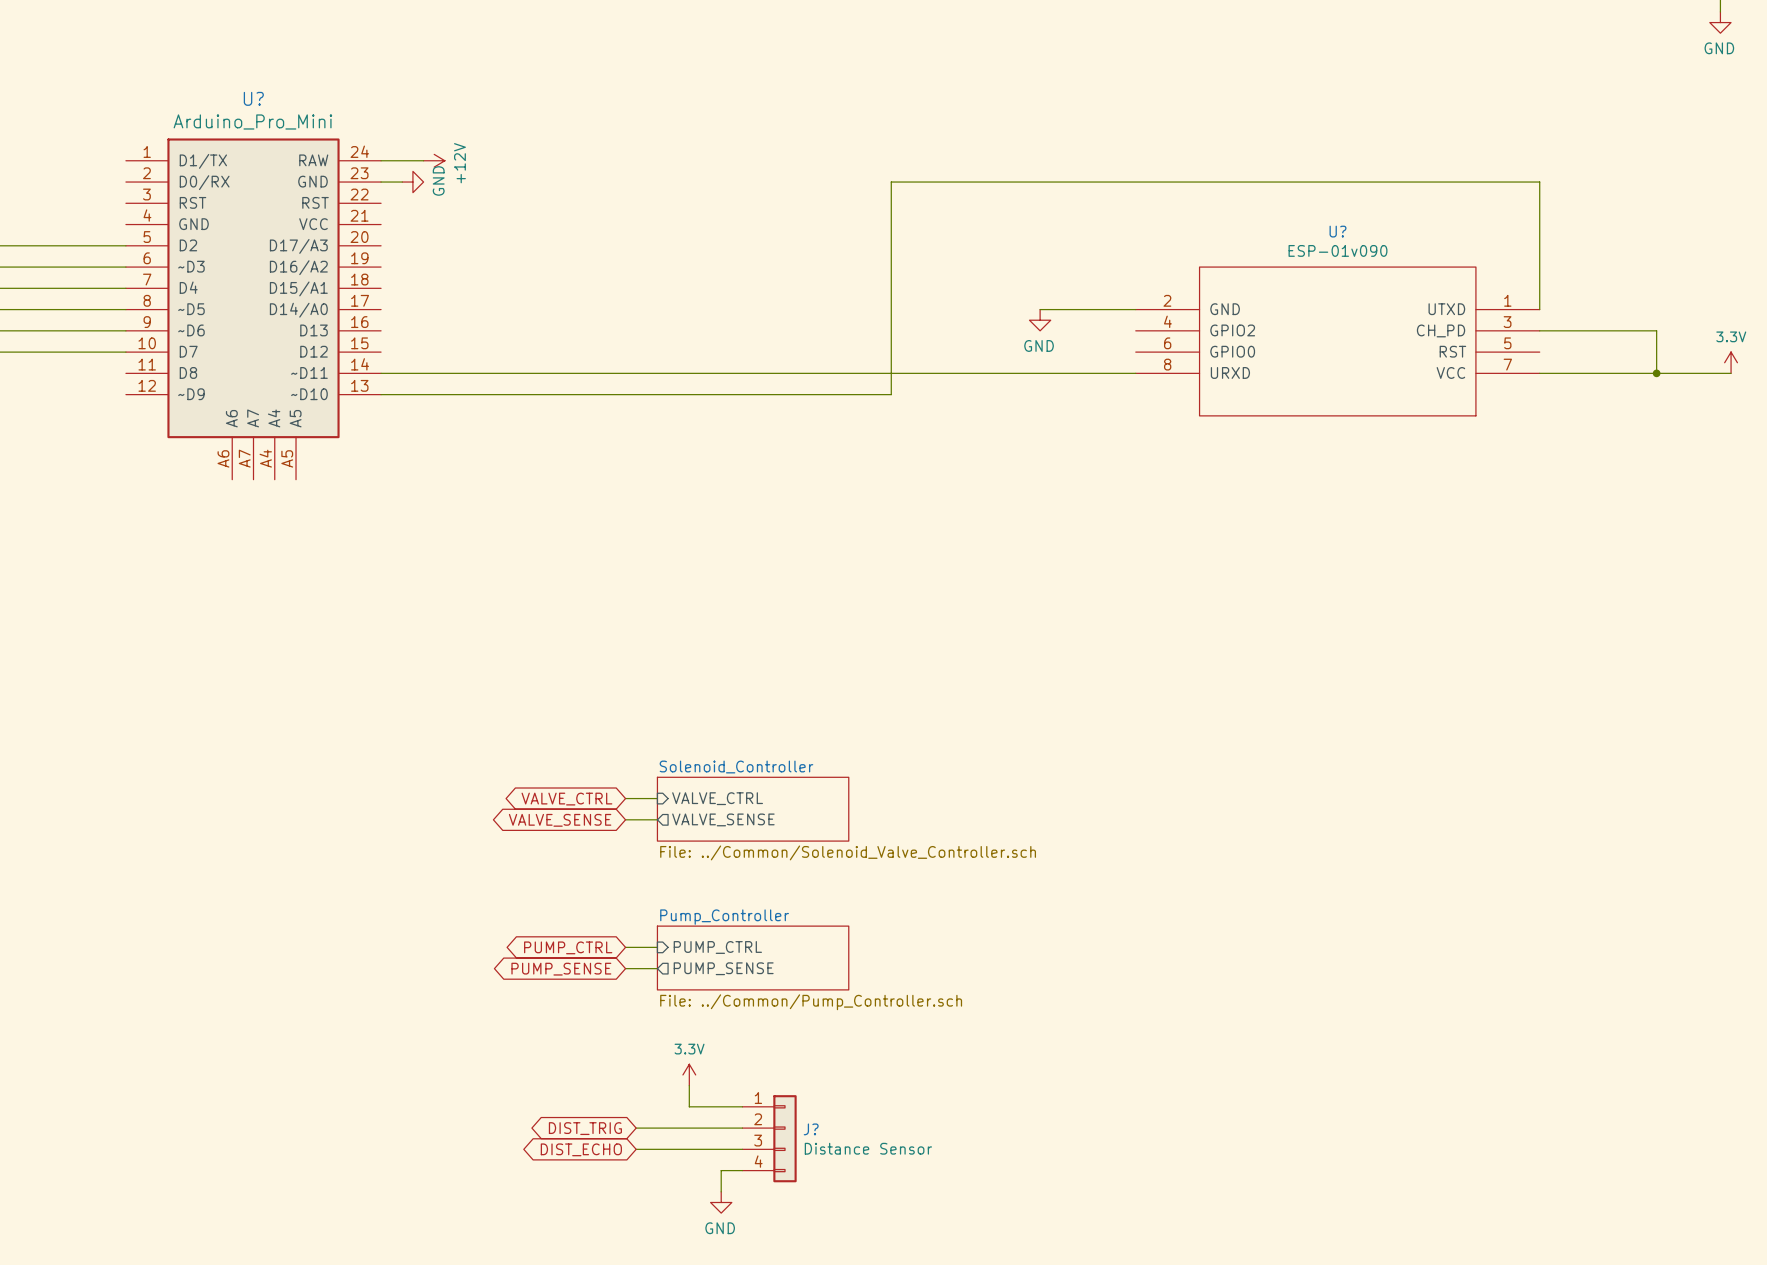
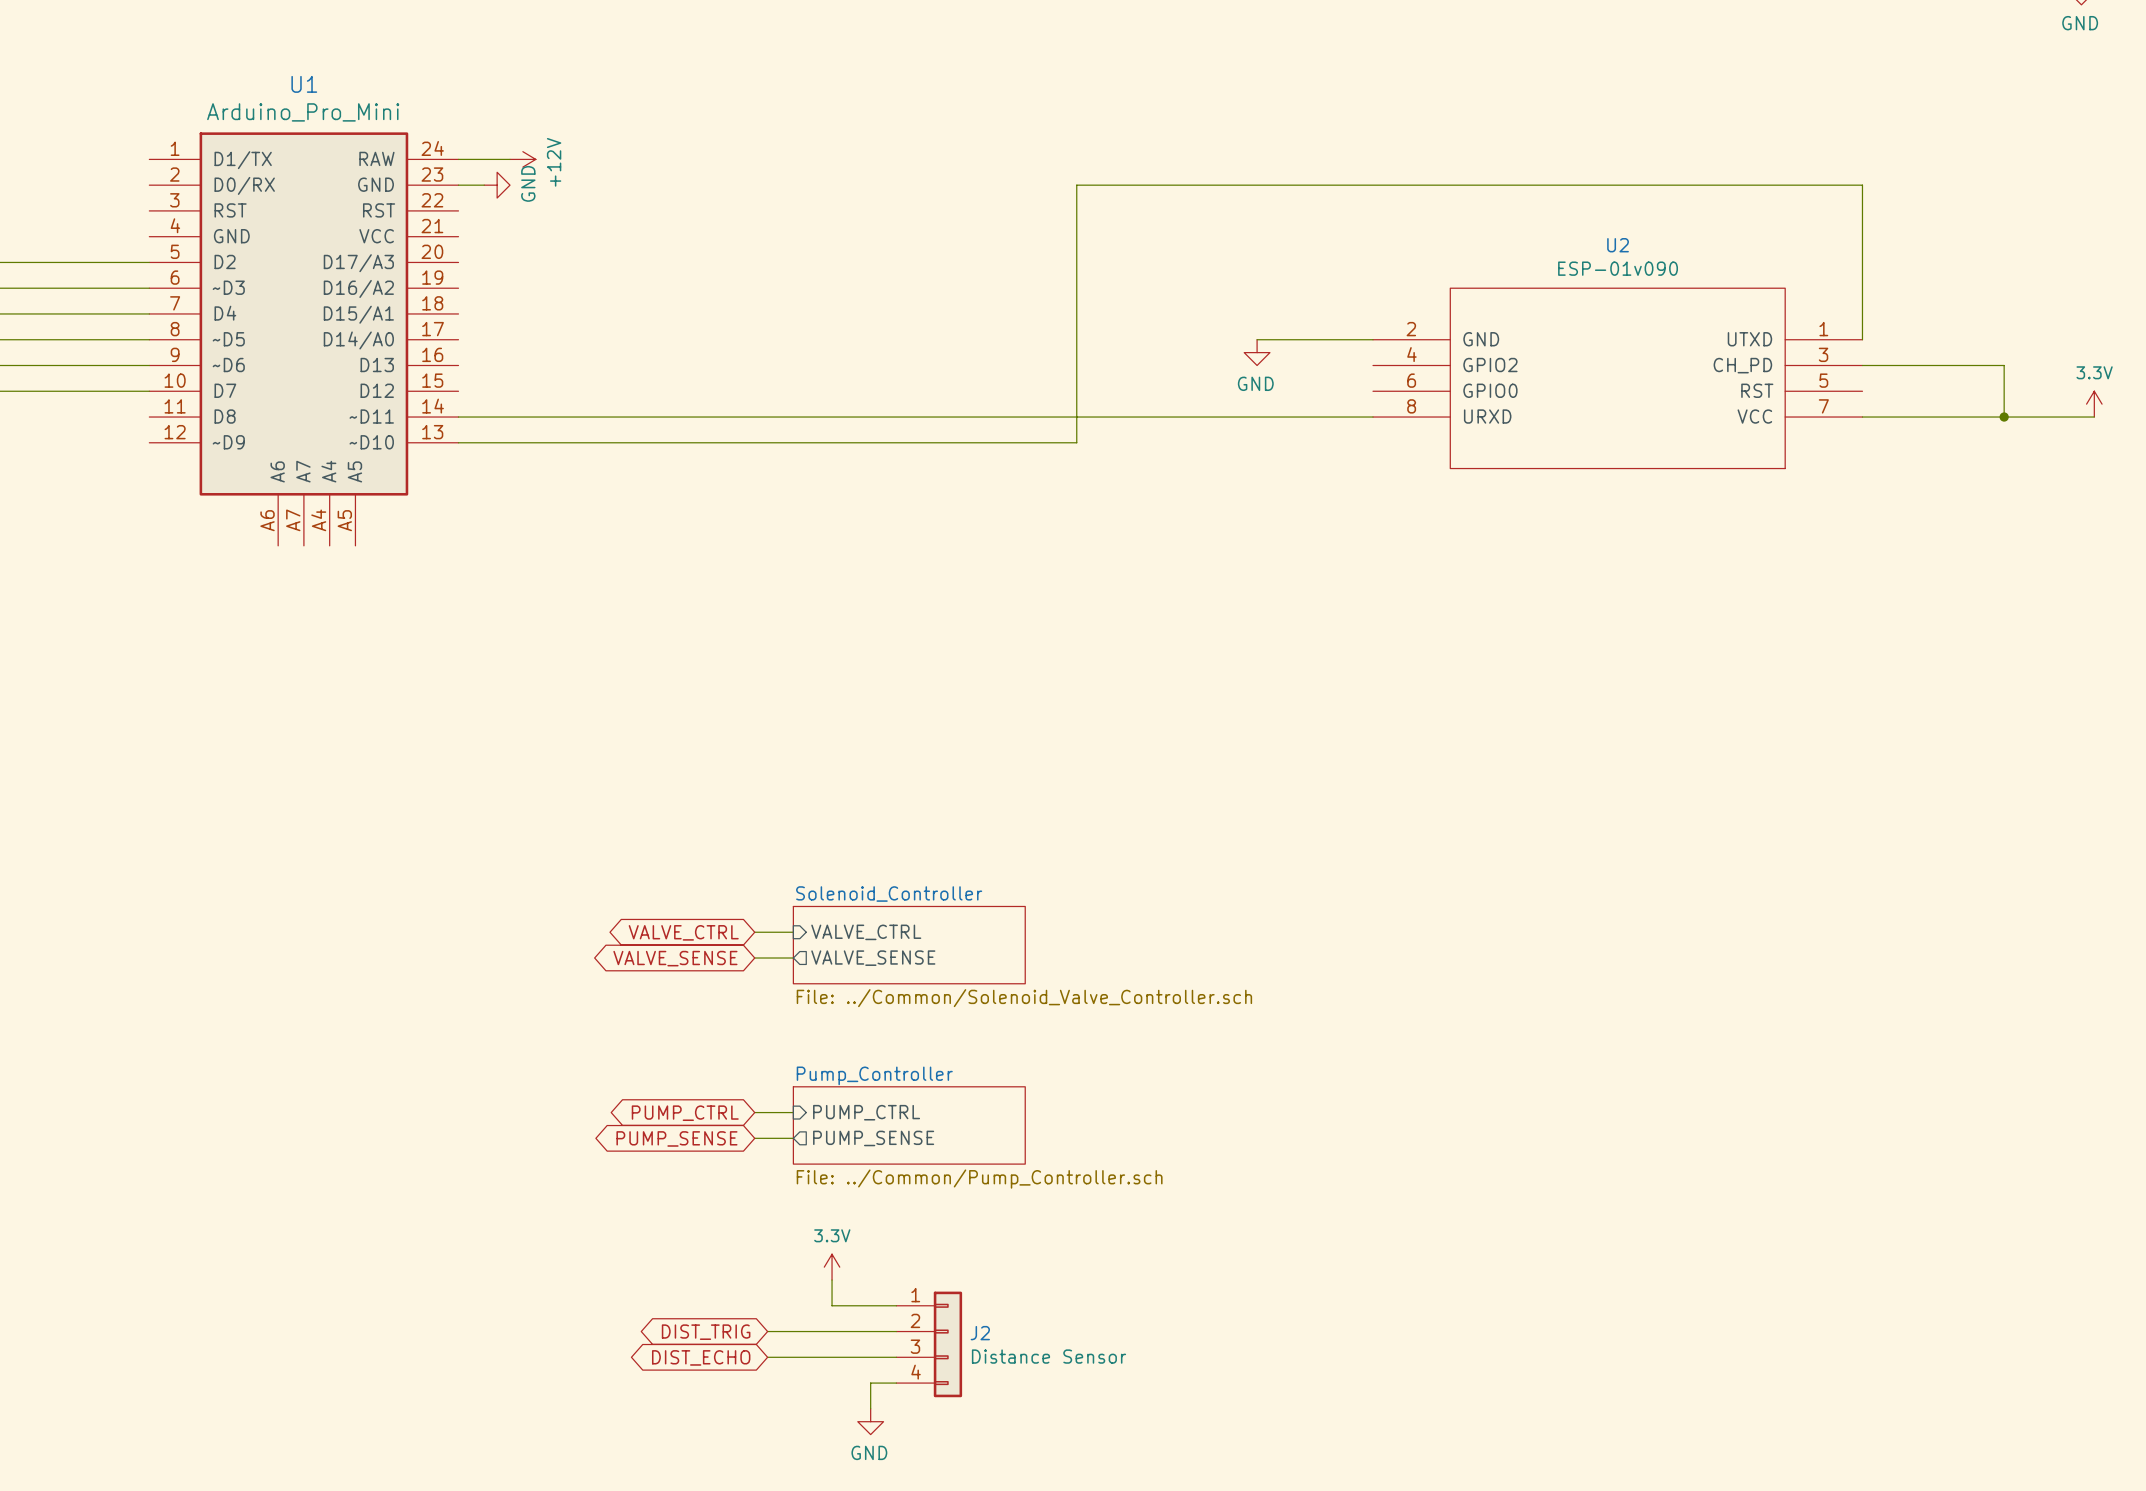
U? name: U? (253, 98) -> U1 (304, 84)
U? name: U? (1337, 231) -> U2 (1618, 245)
J? name: J? (811, 1129) -> J2 (980, 1333)

